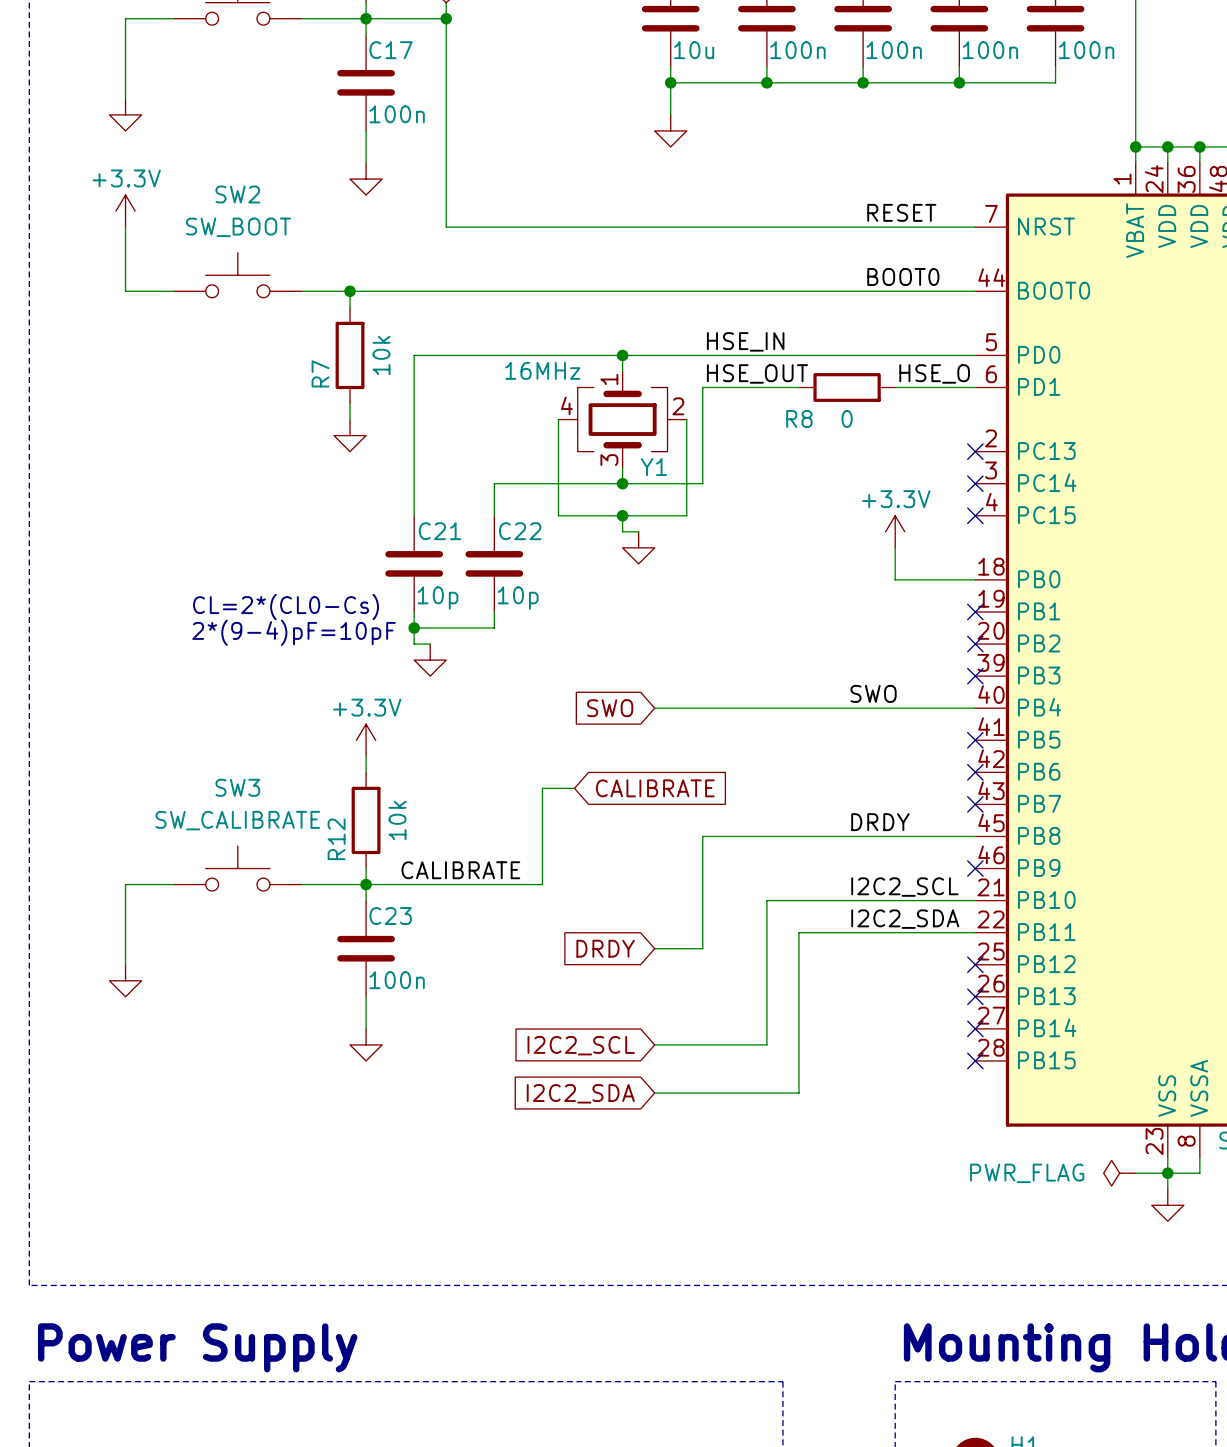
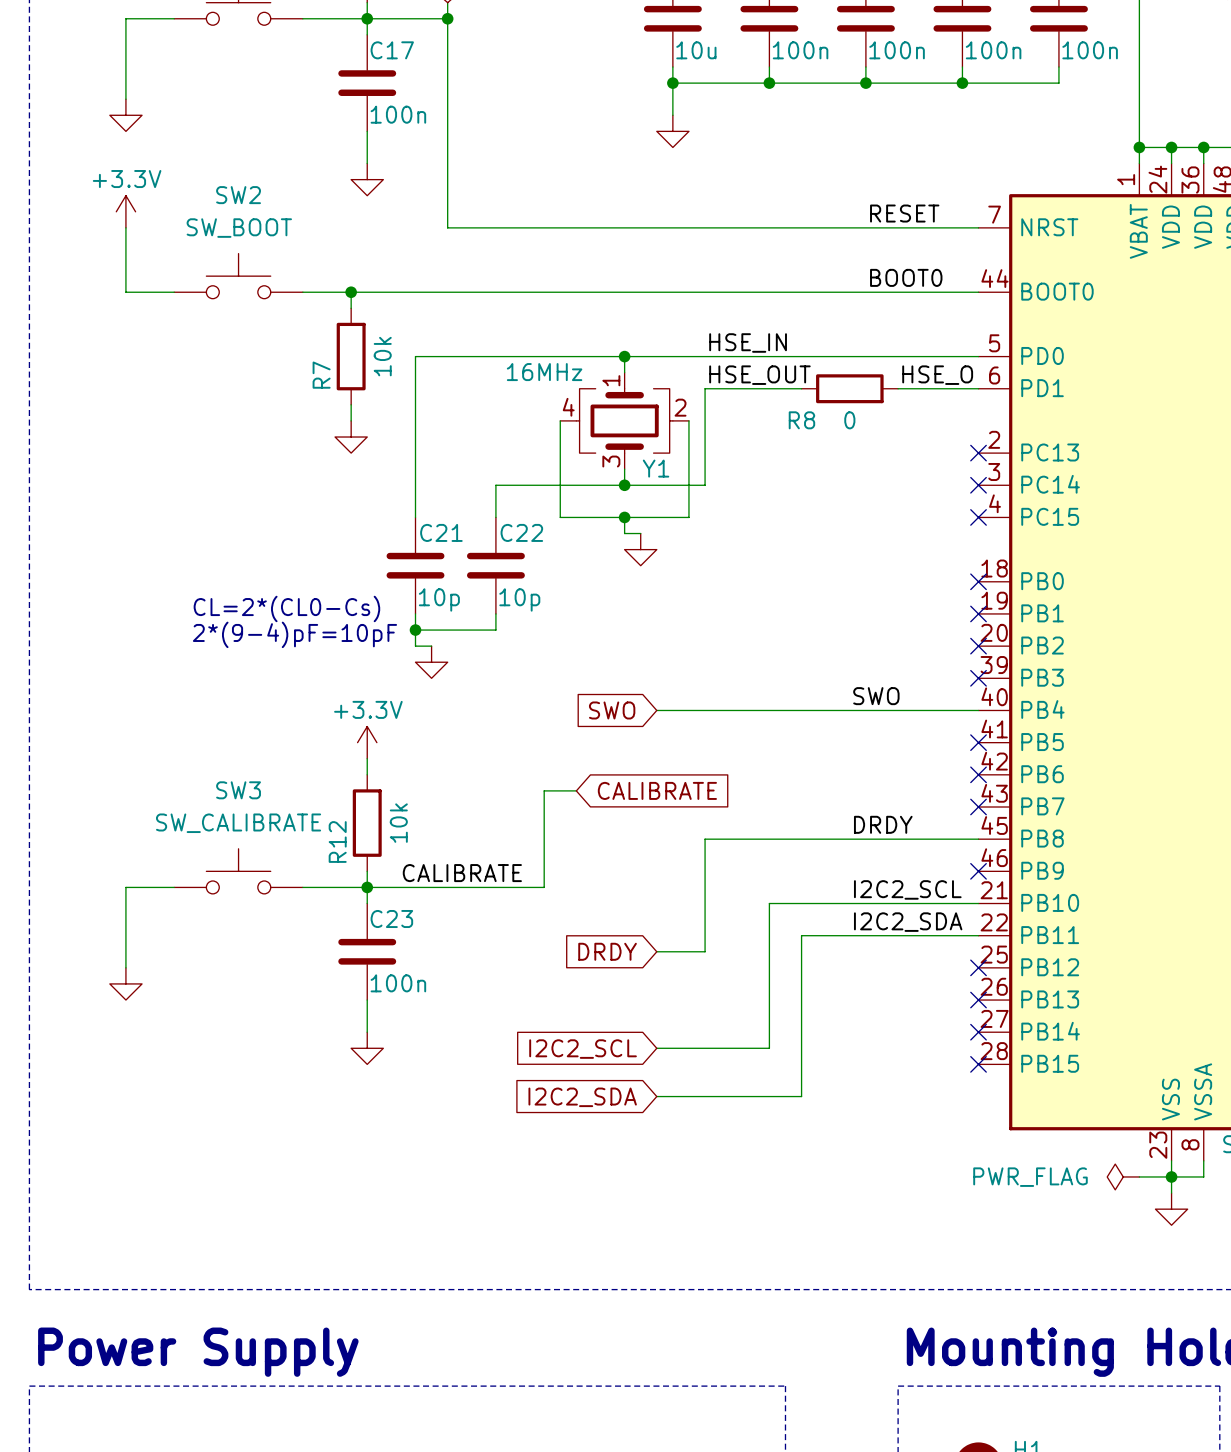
power symbol: +3.3V (895, 531) -> none
wire: (895, 547) (895, 579) (975, 579) -> none
no-connect mark: none -> (978, 581)

